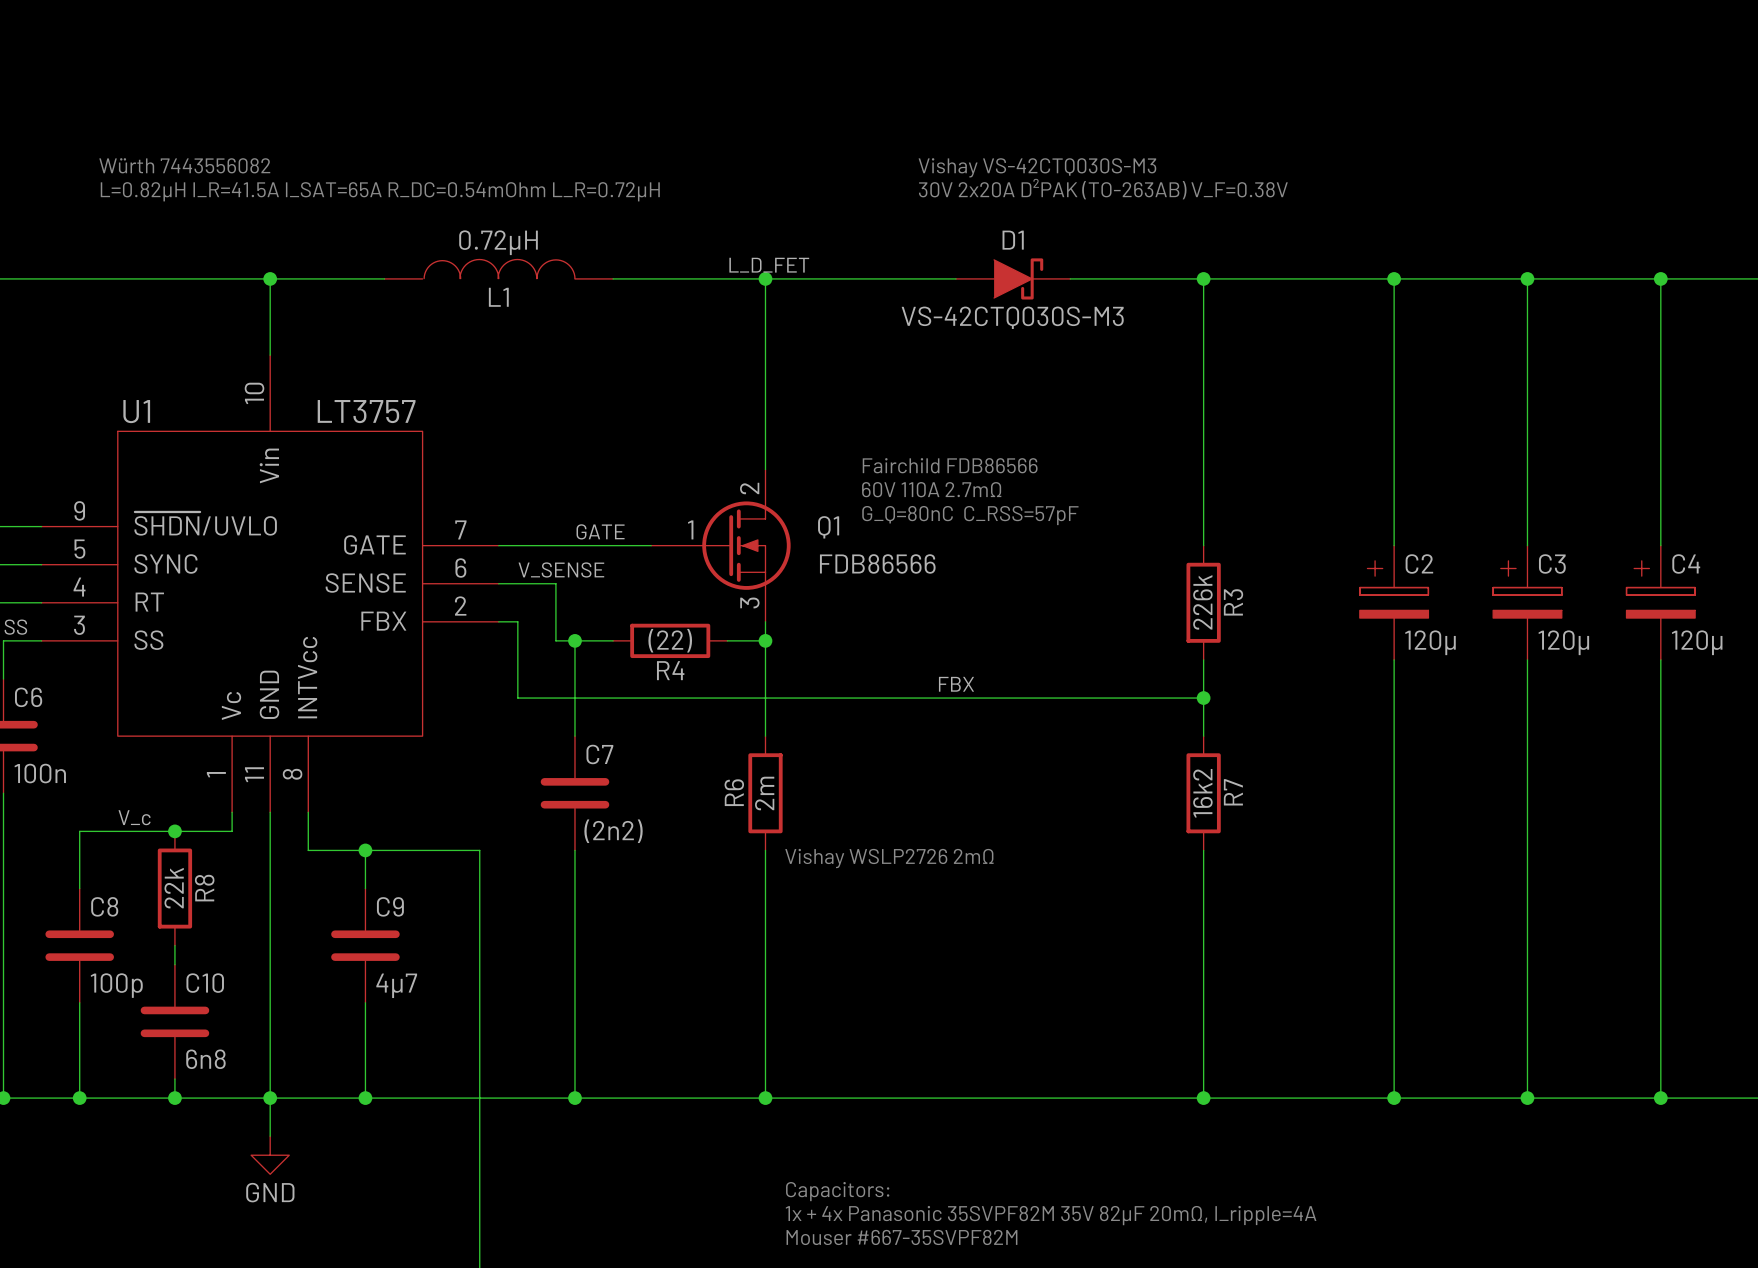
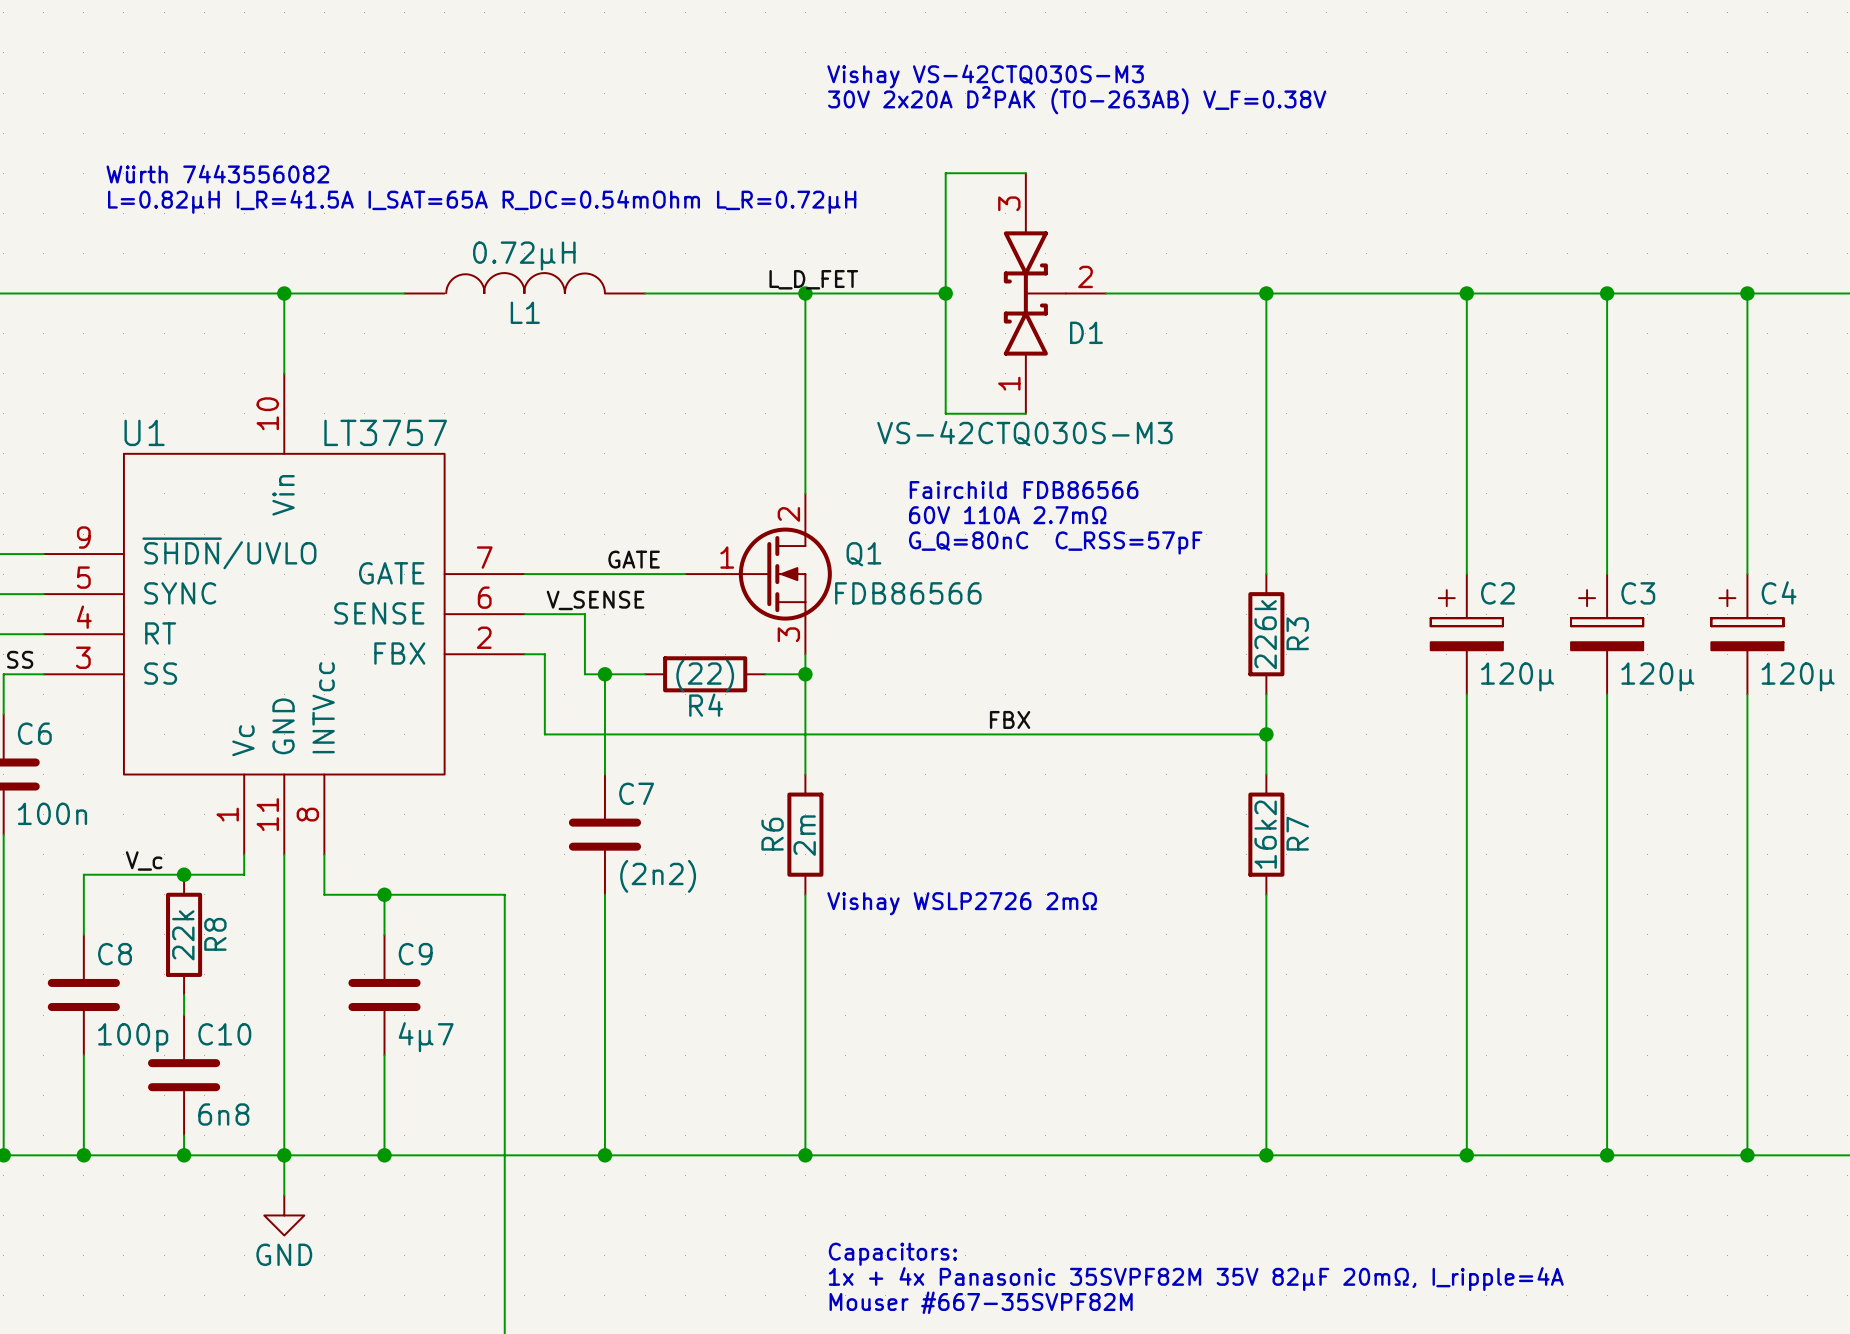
wire: none -> (1025, 173) (945, 173) (945, 413) (1025, 413)
text position: Vishay VS-42CTQ030S-M3 (1037, 167) -> Vishay VS-42CTQ030S-M3 (985, 76)
text position: 30V 2x20A D²PAK (TO-263AB) V_F=0.38V (1103, 189) -> 30V 2x20A D²PAK (TO-263AB) V_F=0.38V (1077, 100)
D1 name position: D1 (1013, 240) -> D1 (1086, 332)
D1 symbol: [955, 258, 1071, 300] -> [1003, 173, 1107, 414]
wire: (898, 278) (955, 278) -> none
junction: none -> (945, 293)
D1 value position: VS-42CTQ030S-M3 (1012, 317) -> VS-42CTQ030S-M3 (1024, 433)

